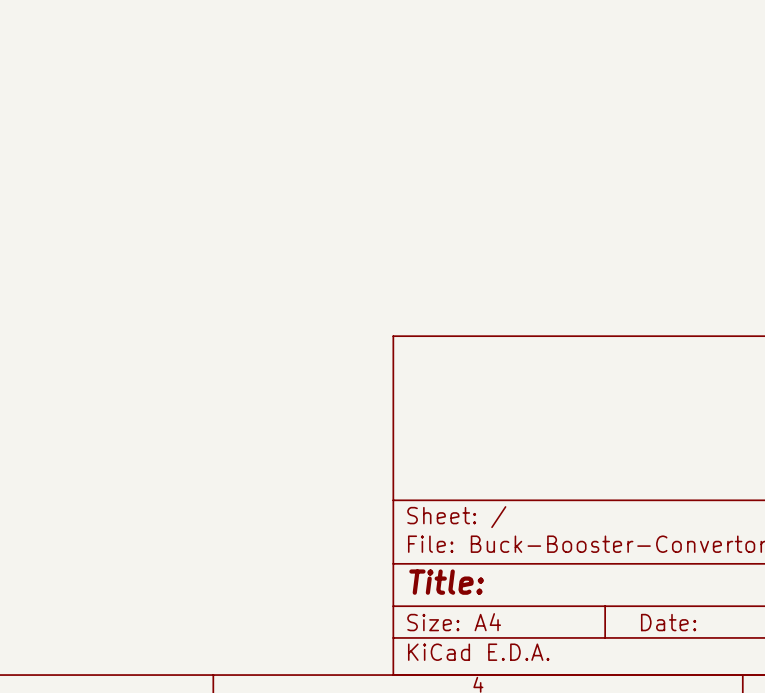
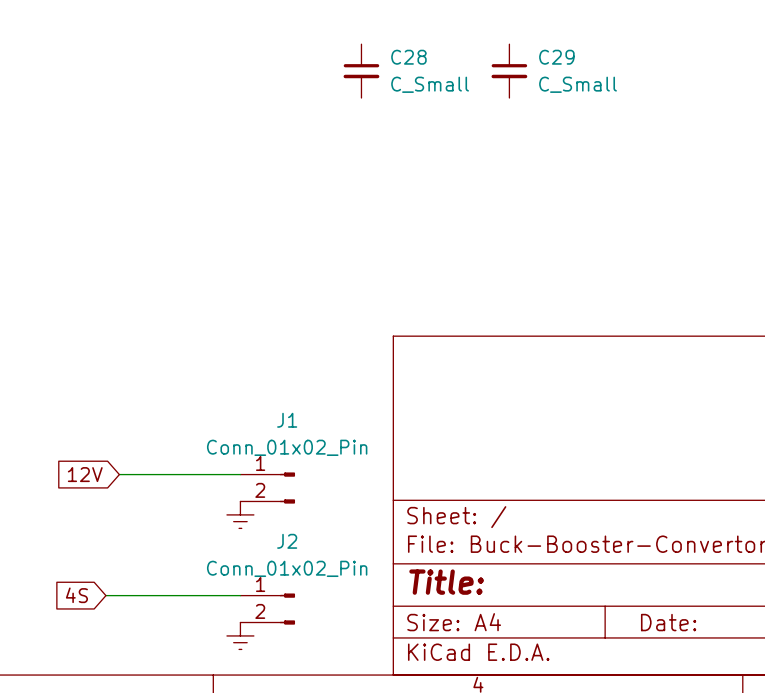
C28: none -> C_Small (361, 71)
C29: none -> C_Small (509, 71)
global label: none -> 12V (85, 474)
wire: none -> (119, 474) (240, 474)
J1: none -> Conn_01x02_Pin (267, 488)
power symbol: none -> (240, 514)
global label: none -> 4S (76, 595)
wire: none -> (105, 595) (240, 595)
J2: none -> Conn_01x02_Pin (267, 609)
power symbol: none -> (240, 635)

